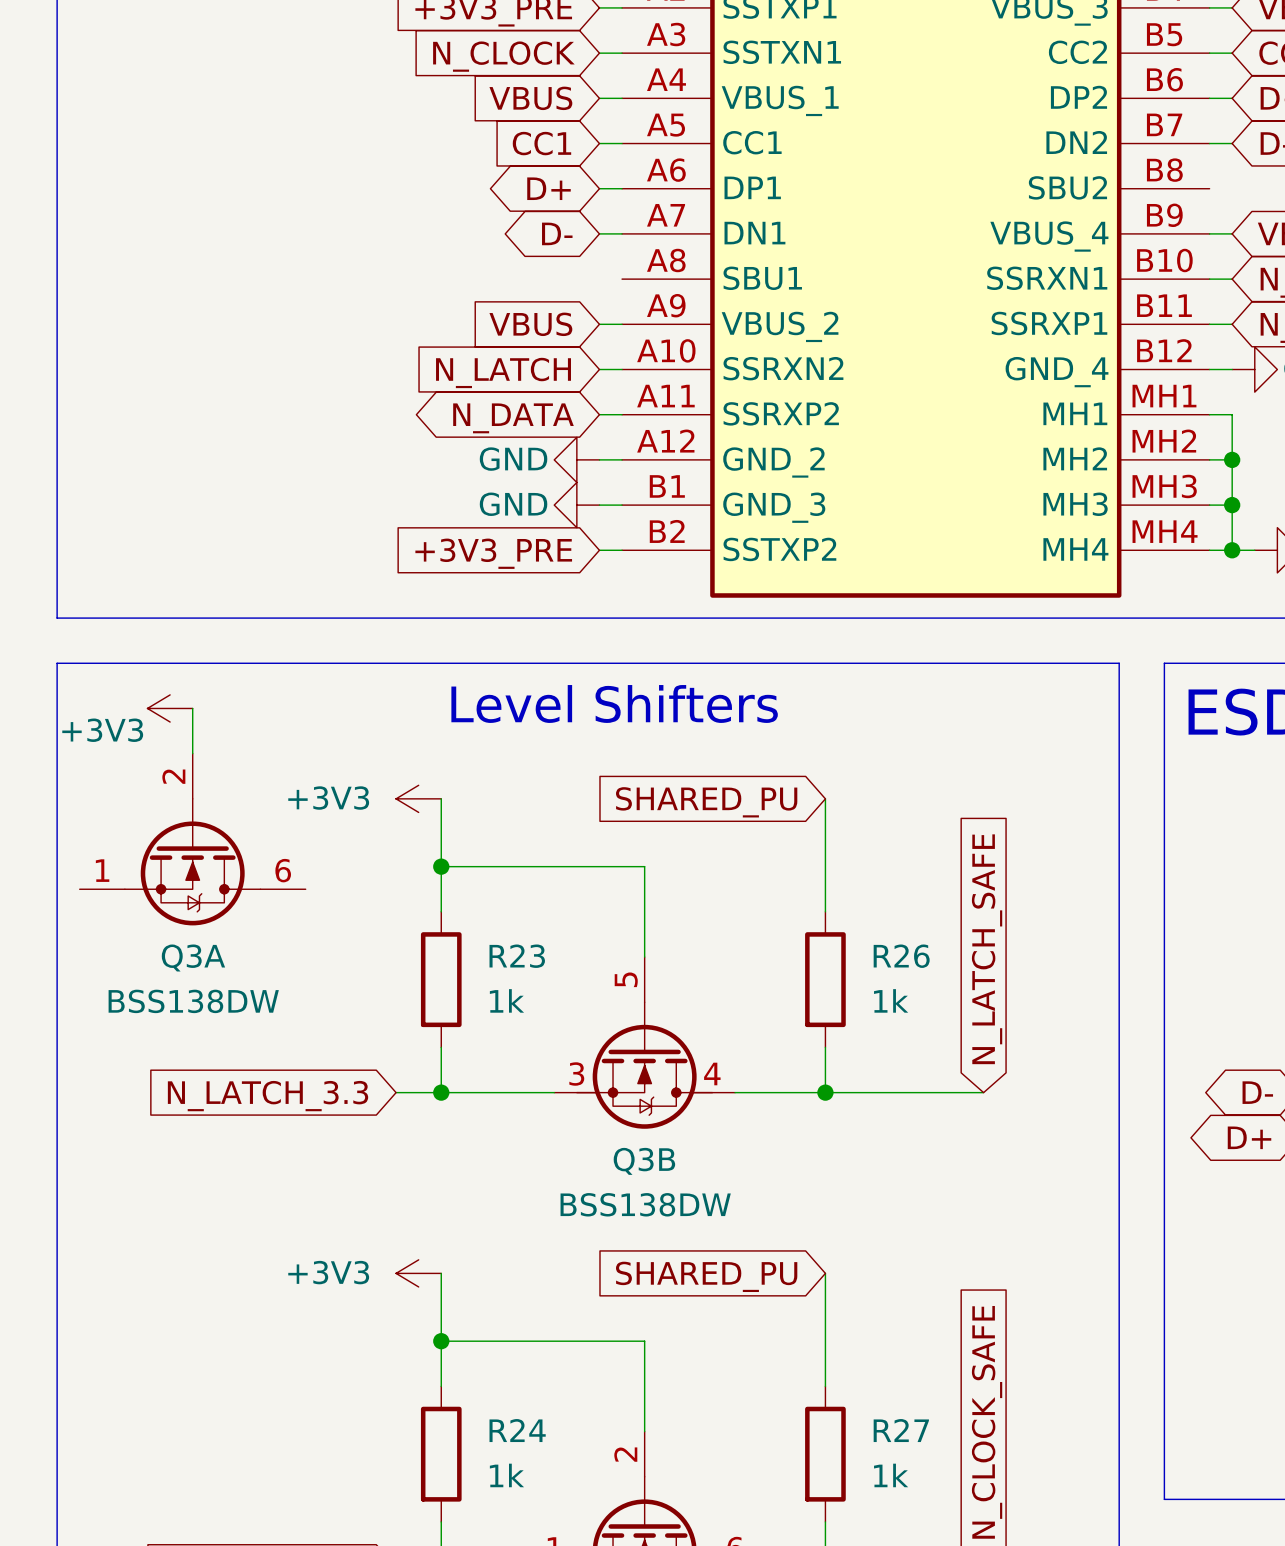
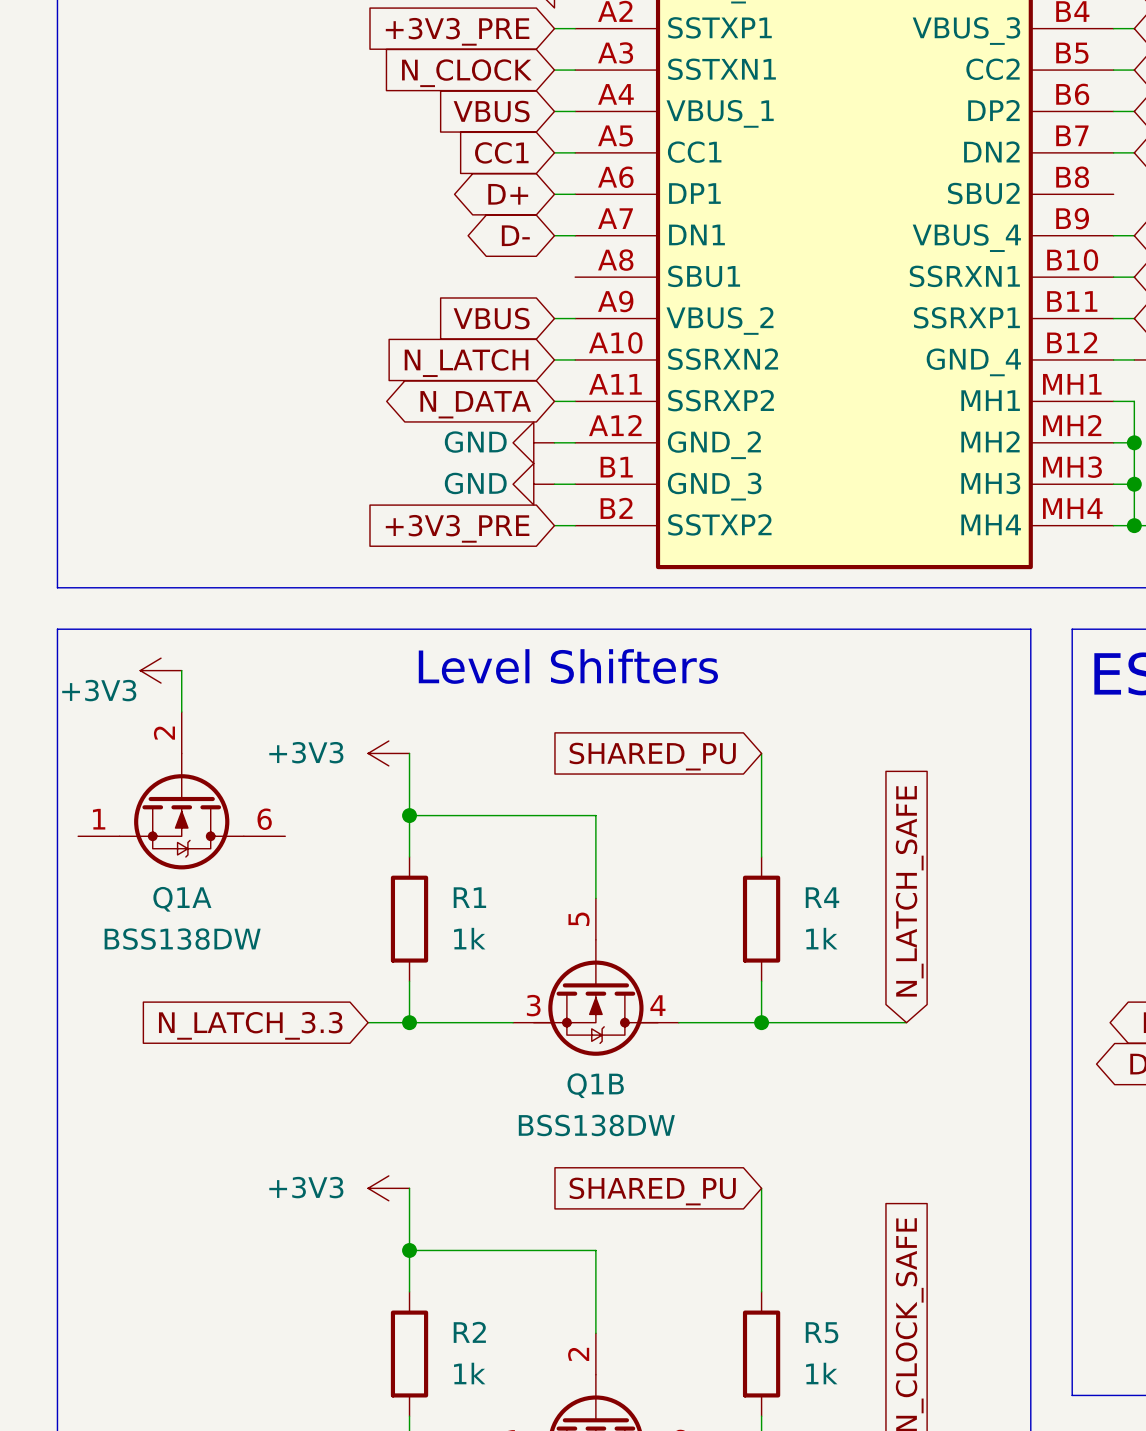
R23 name: R23 (517, 956) -> R1 (469, 897)
R26 name: R26 (901, 956) -> R4 (822, 897)
Q3A name: Q3A (193, 957) -> Q1A (182, 899)
Q3B name: Q3B (644, 1161) -> Q1B (595, 1085)
R24 name: R24 (517, 1430) -> R2 (469, 1332)
R27 name: R27 (901, 1430) -> R5 (822, 1332)

